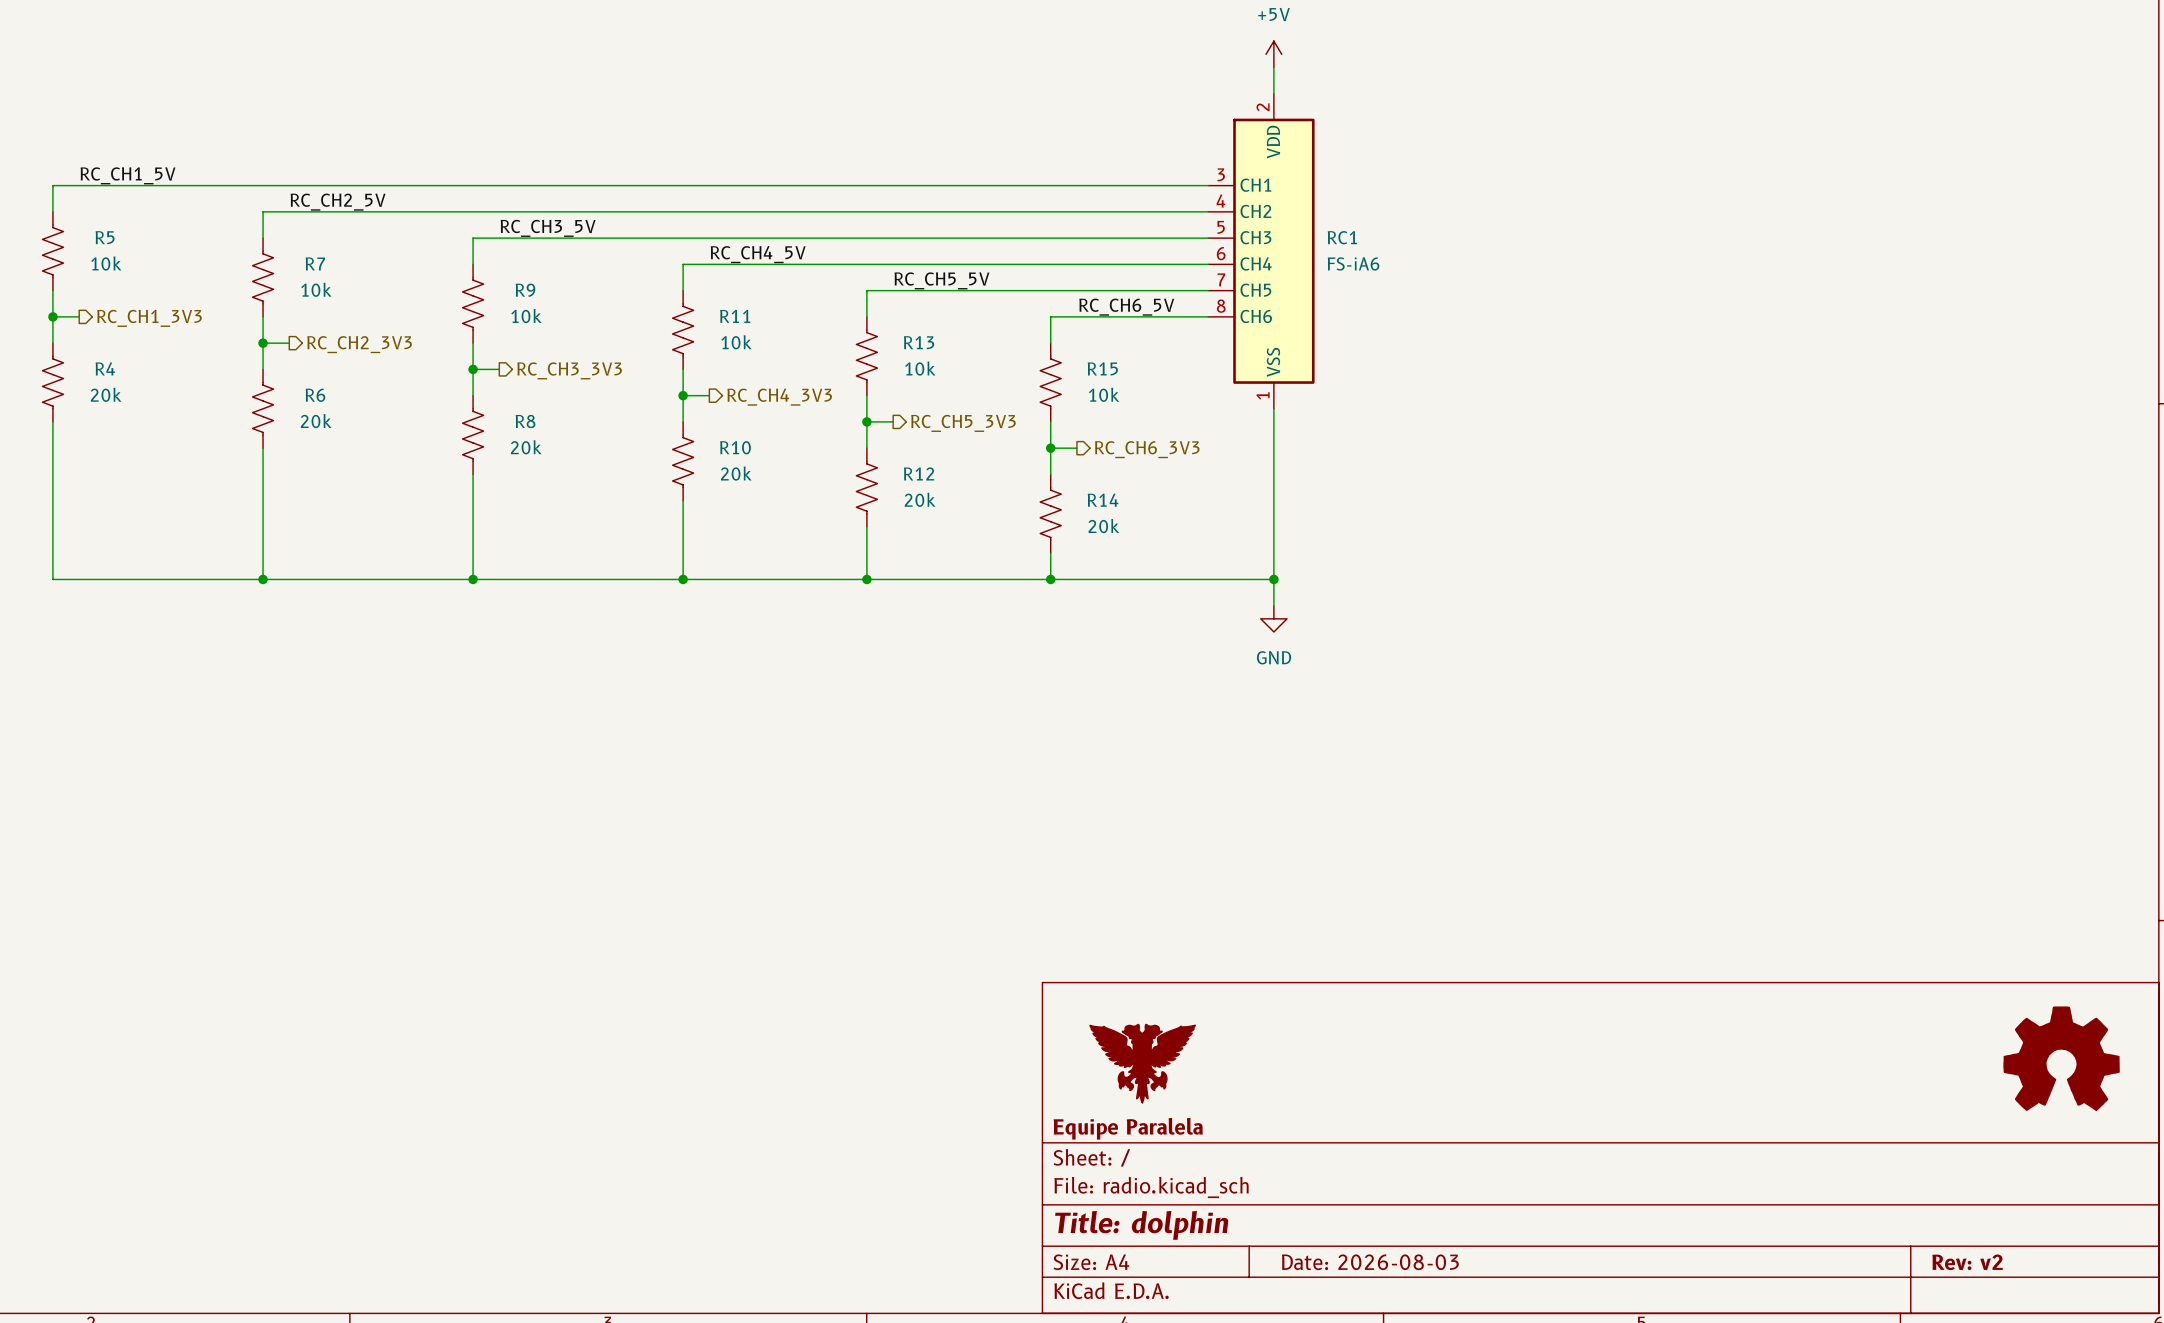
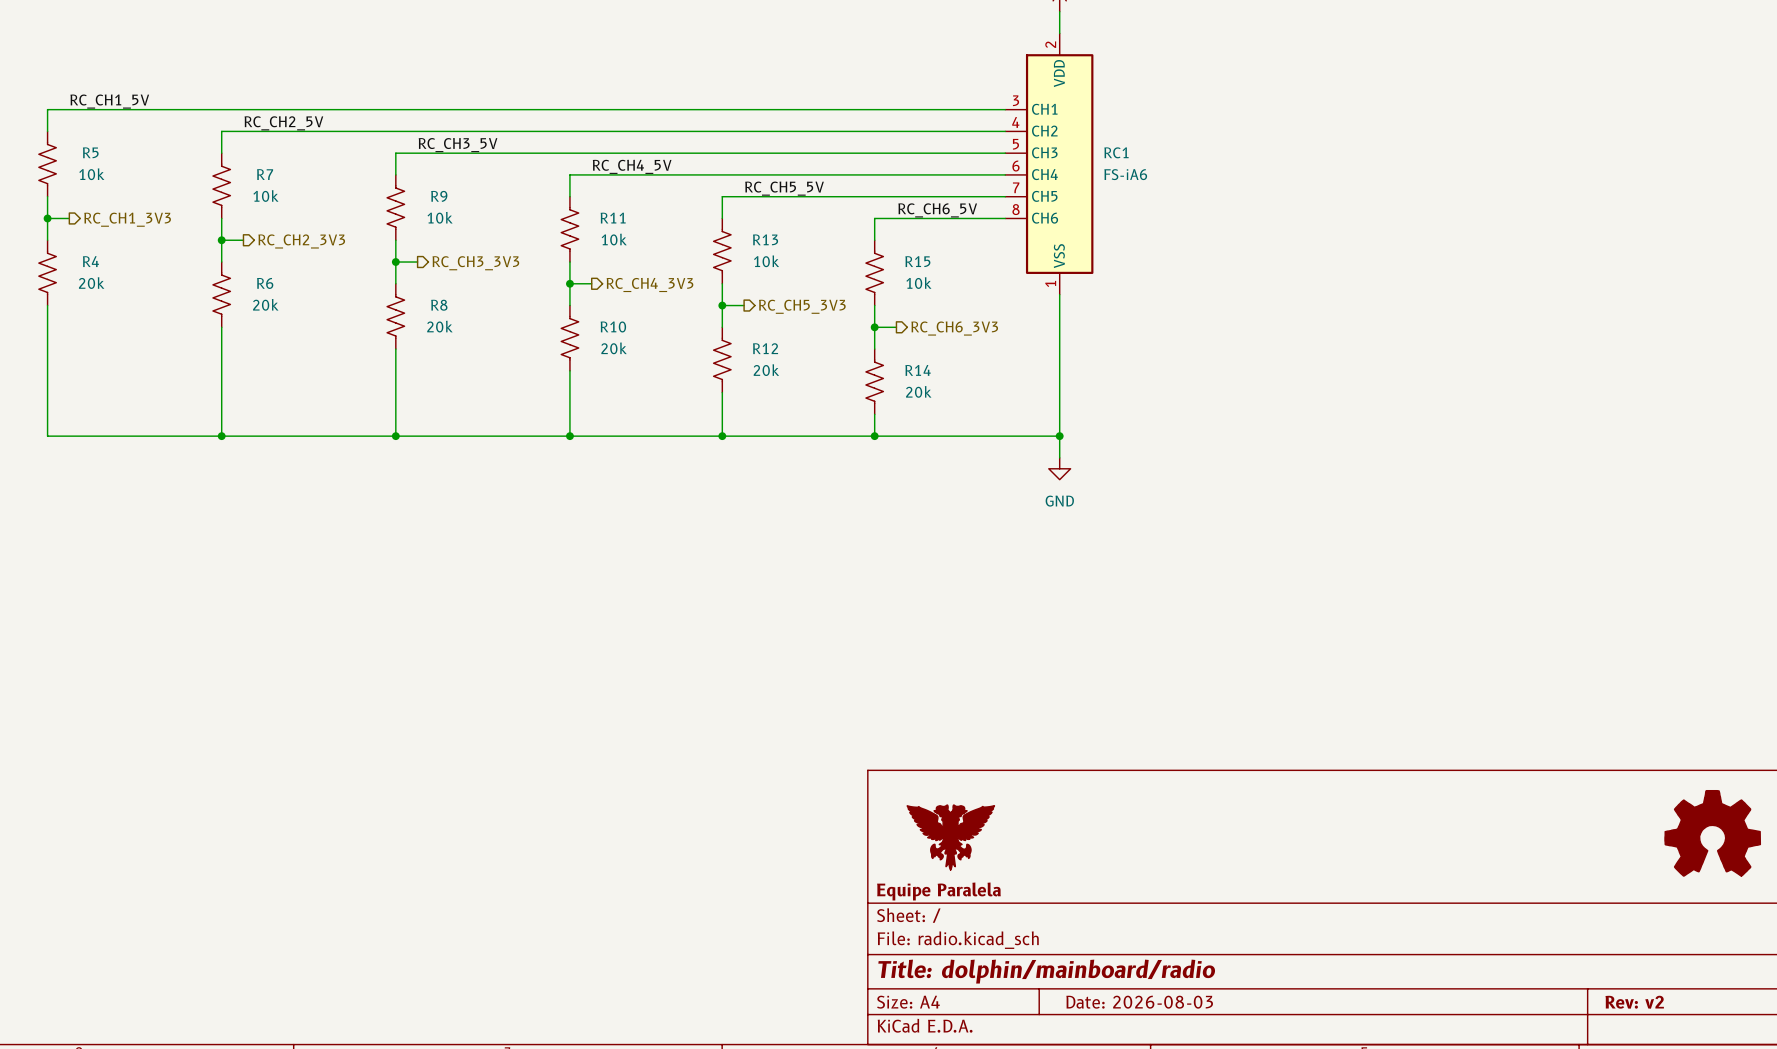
title block: Title: dolphin (1141, 1225) -> Title: dolphin/mainboard/radio (1046, 971)

